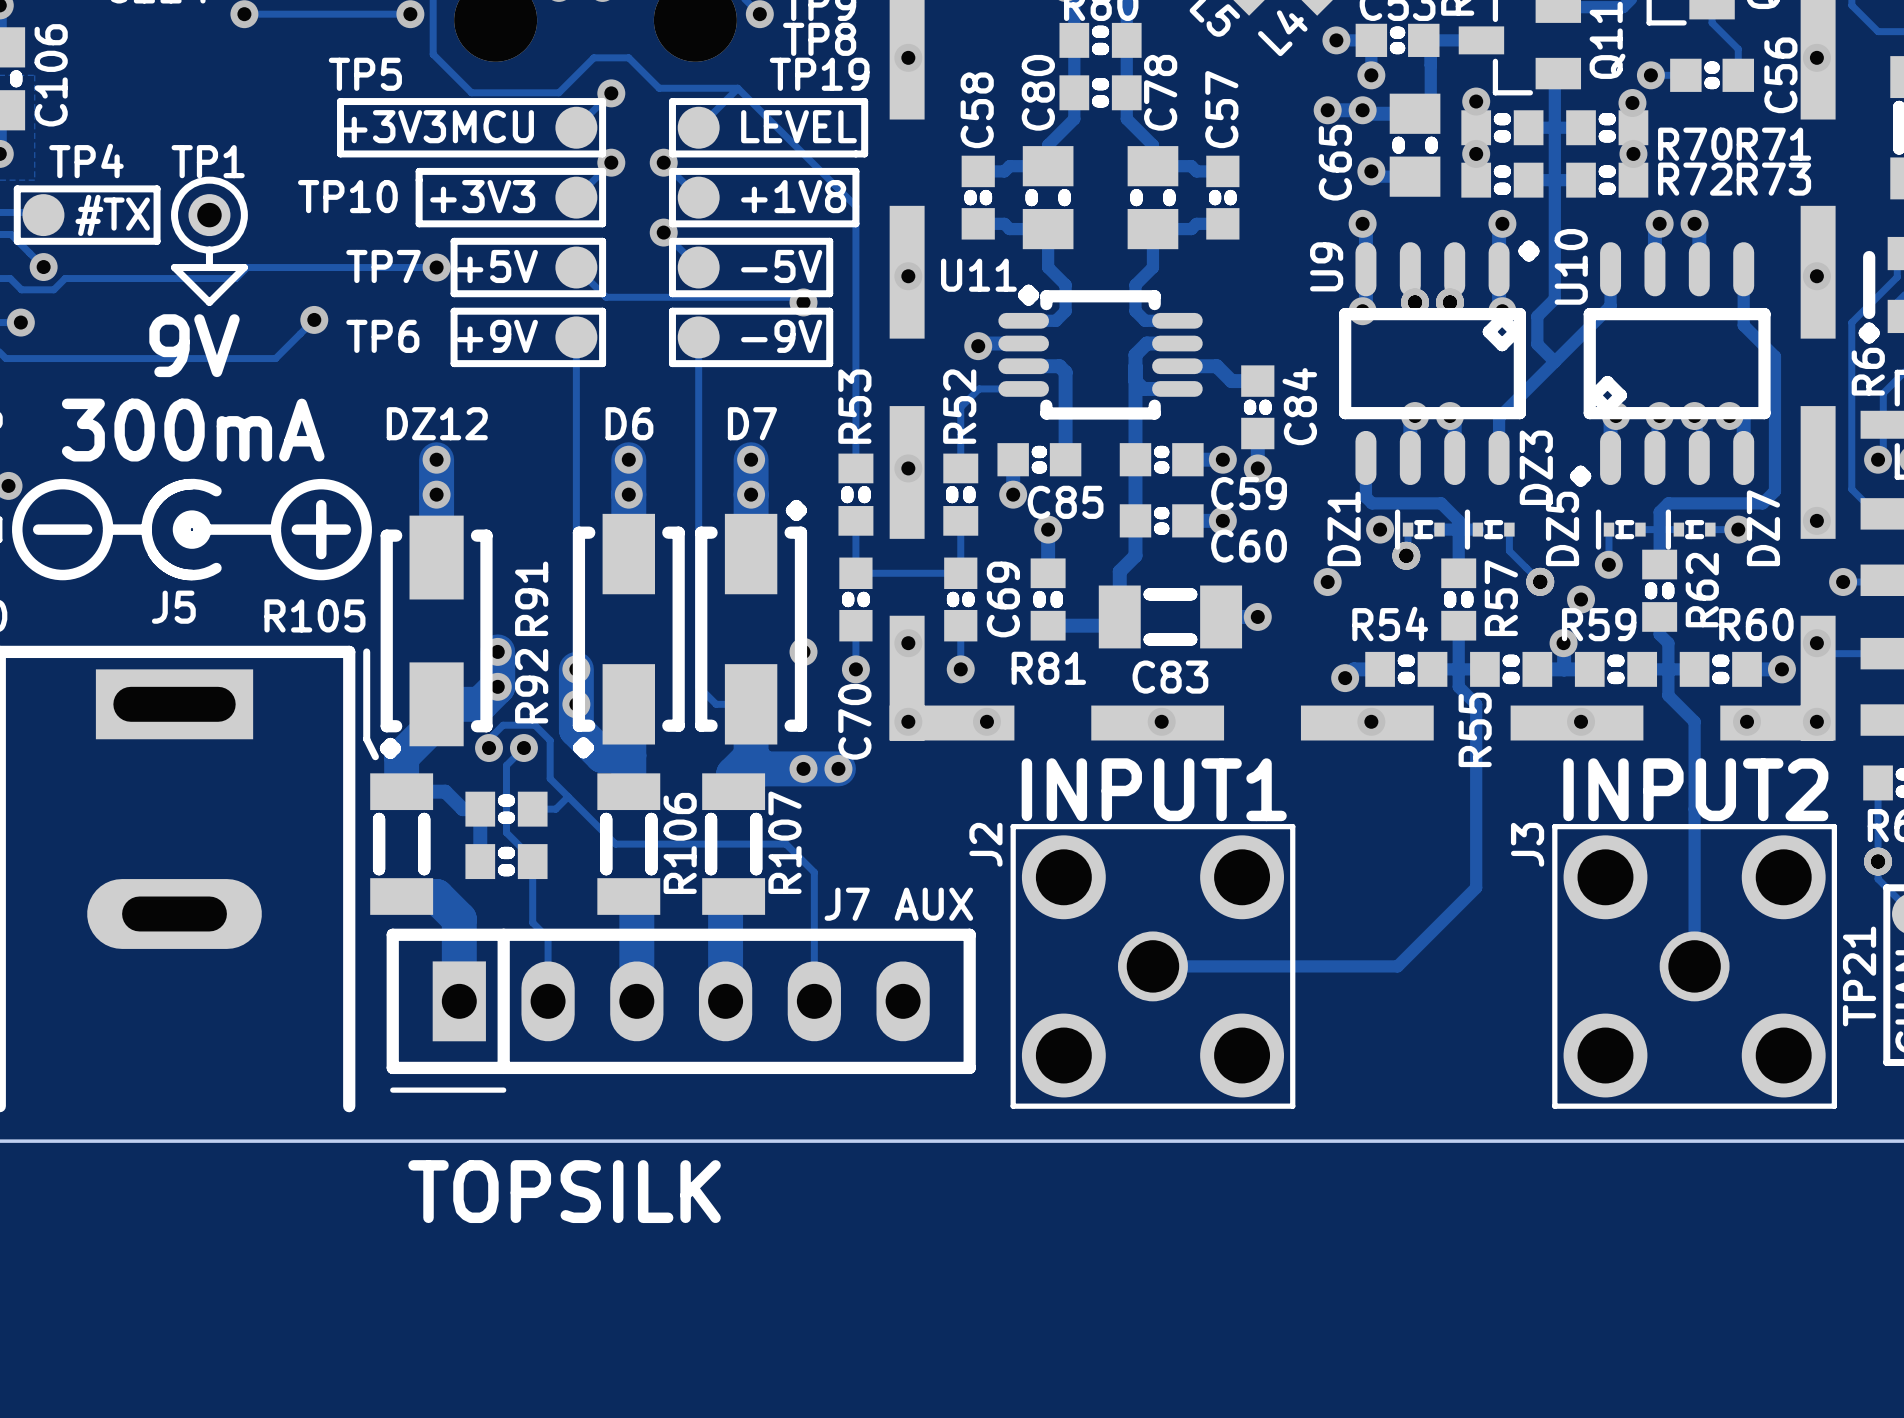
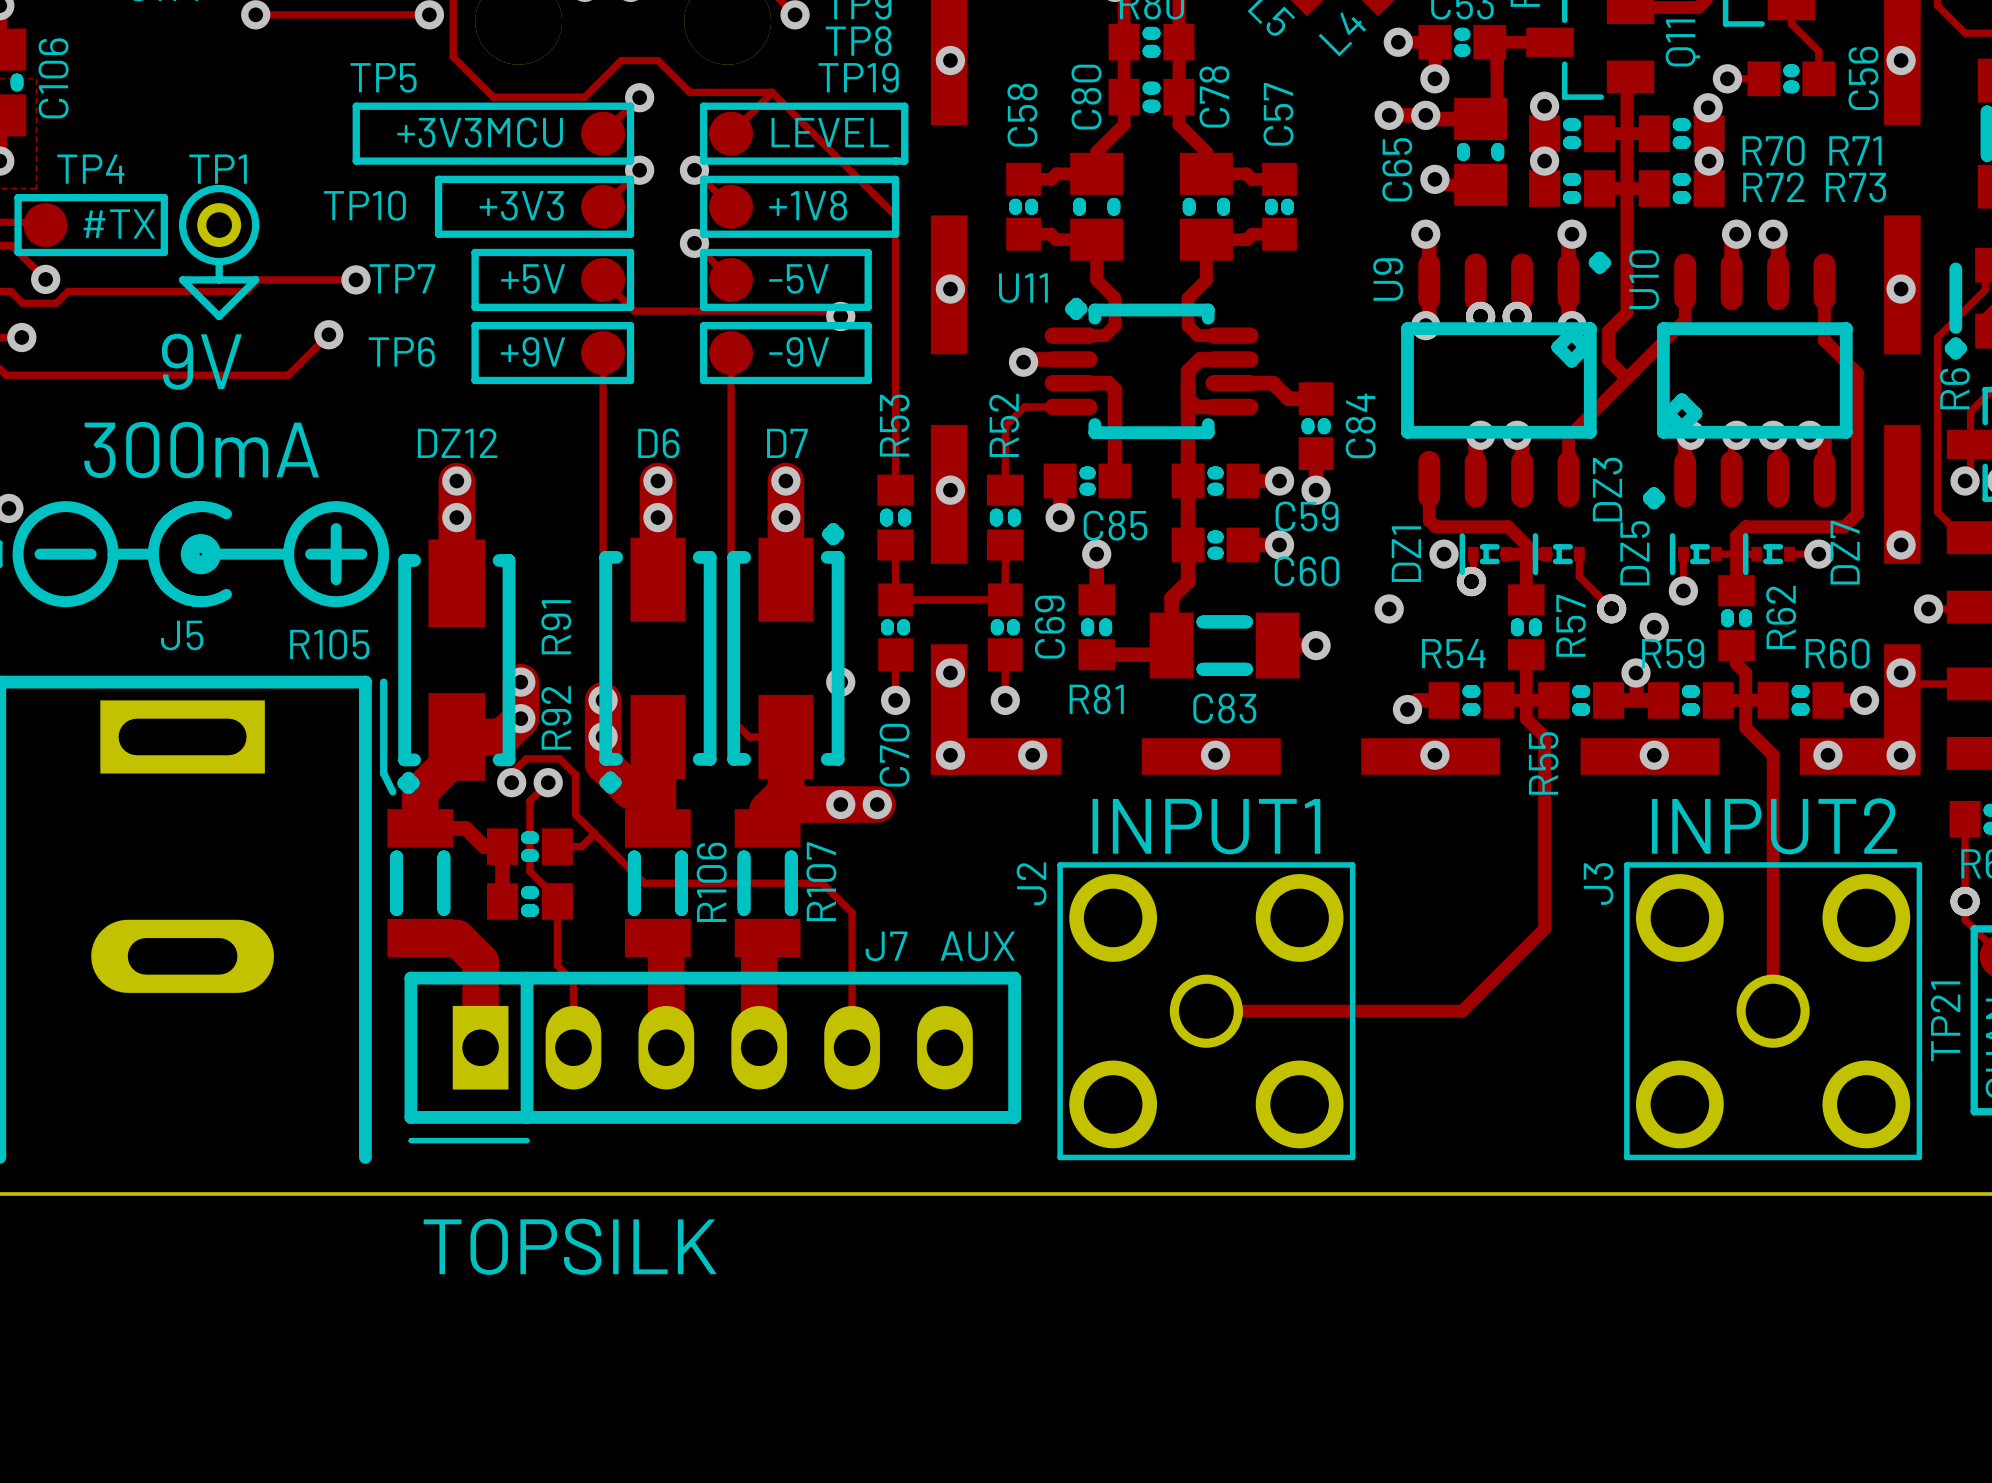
track: (340, 267) (436, 267) -> none
via position: (436, 267) -> (356, 279)

